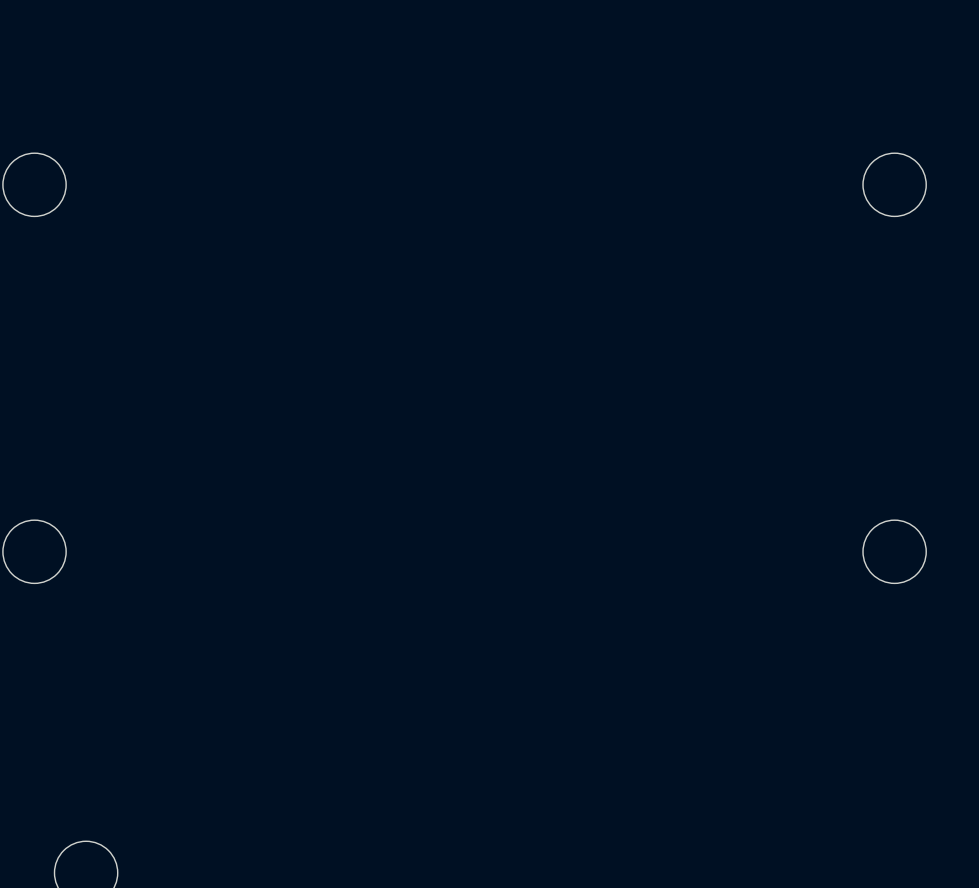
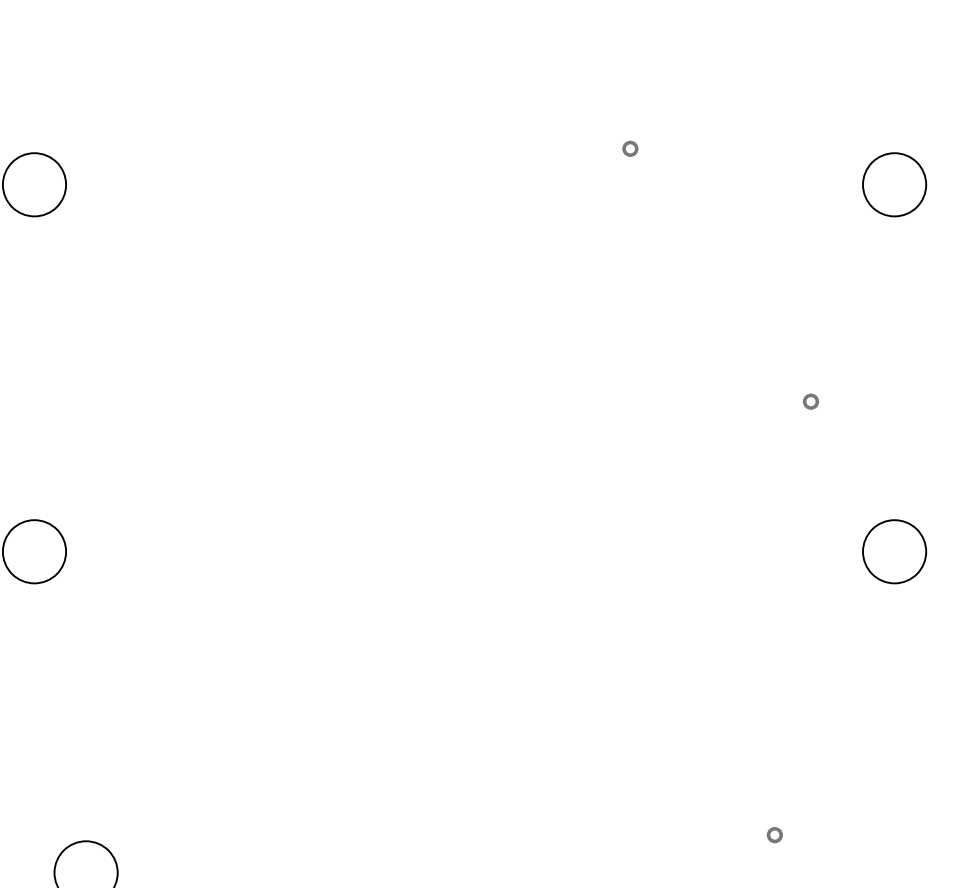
via: none -> (630, 148)
via: none -> (810, 401)
via: none -> (774, 835)

